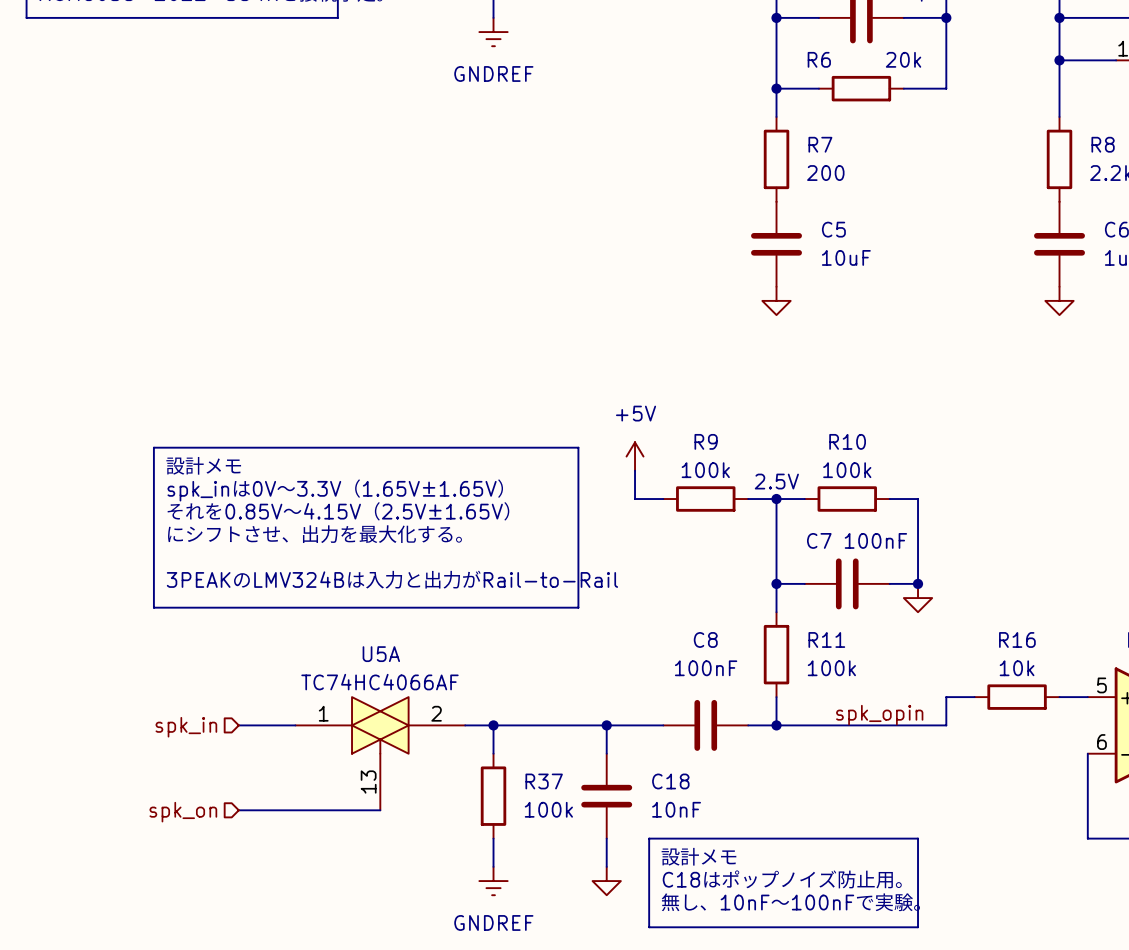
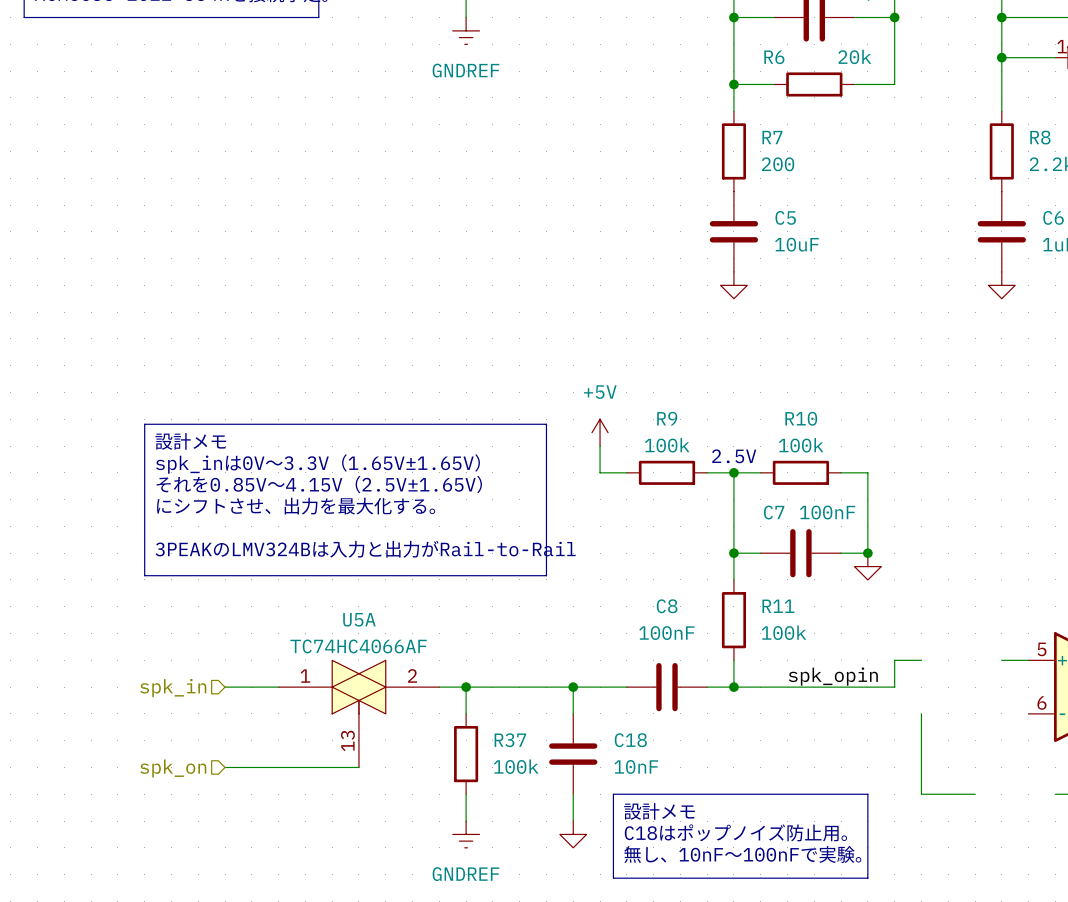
R16: 10k (1017, 697) -> none
wire: none -> (921, 713) (921, 794) (975, 794)
wire: (1087, 753) (1087, 838) (1116, 838) -> none

